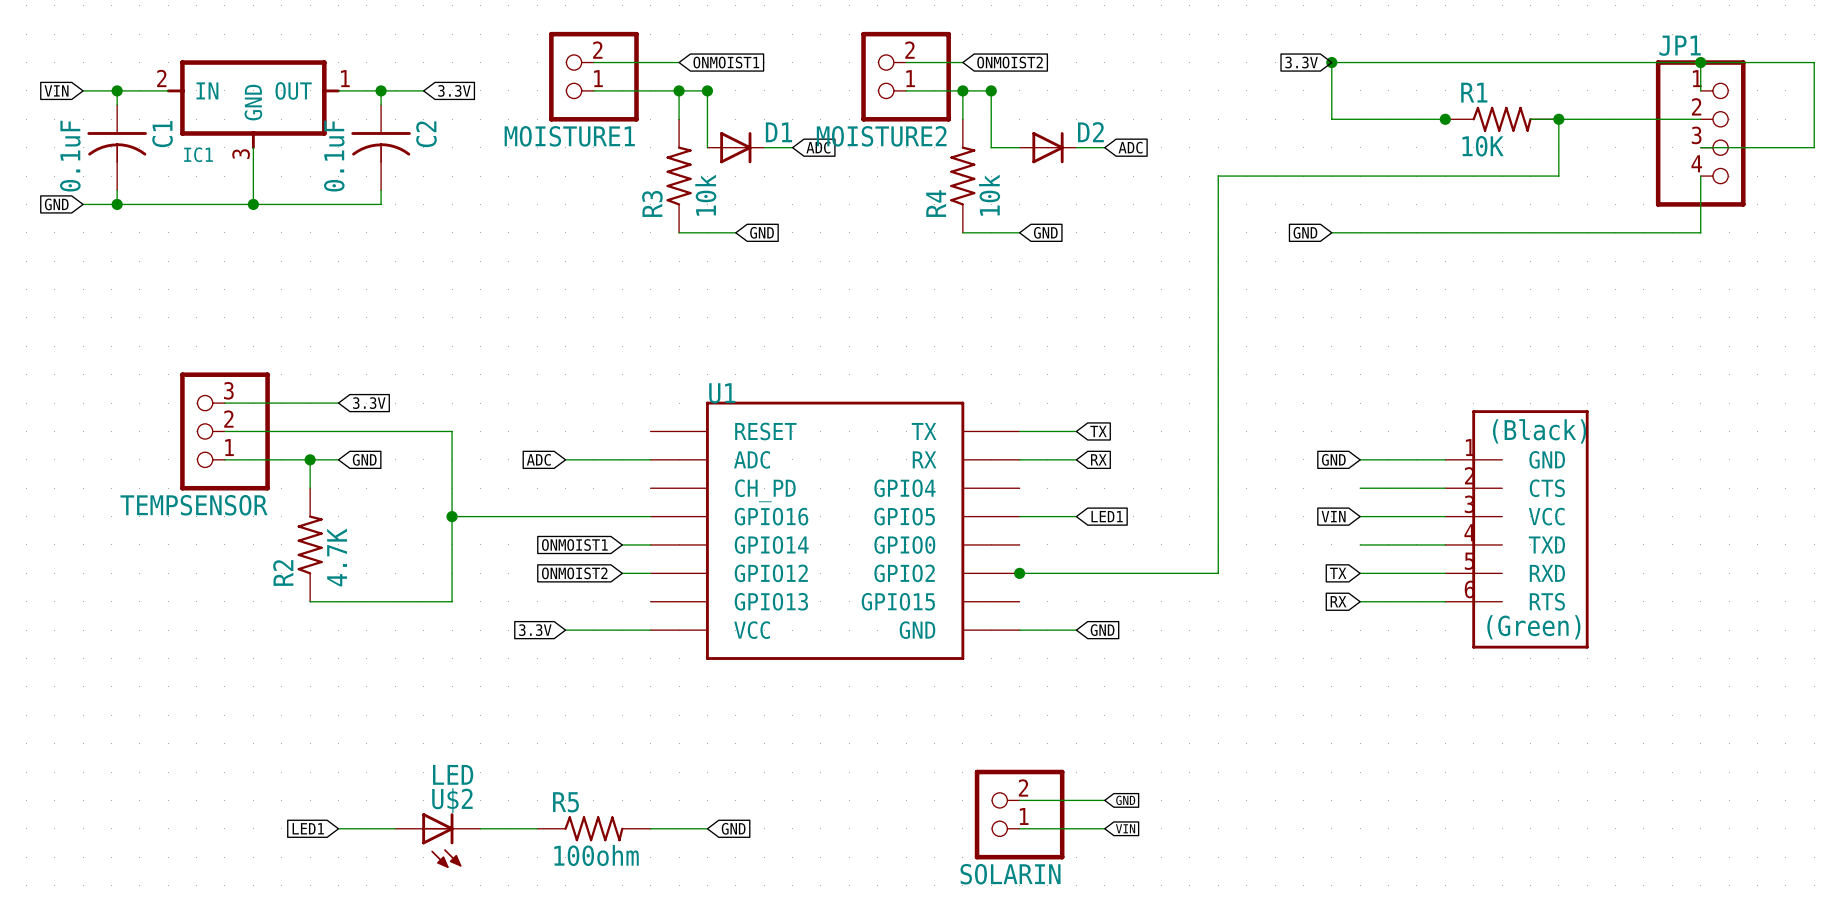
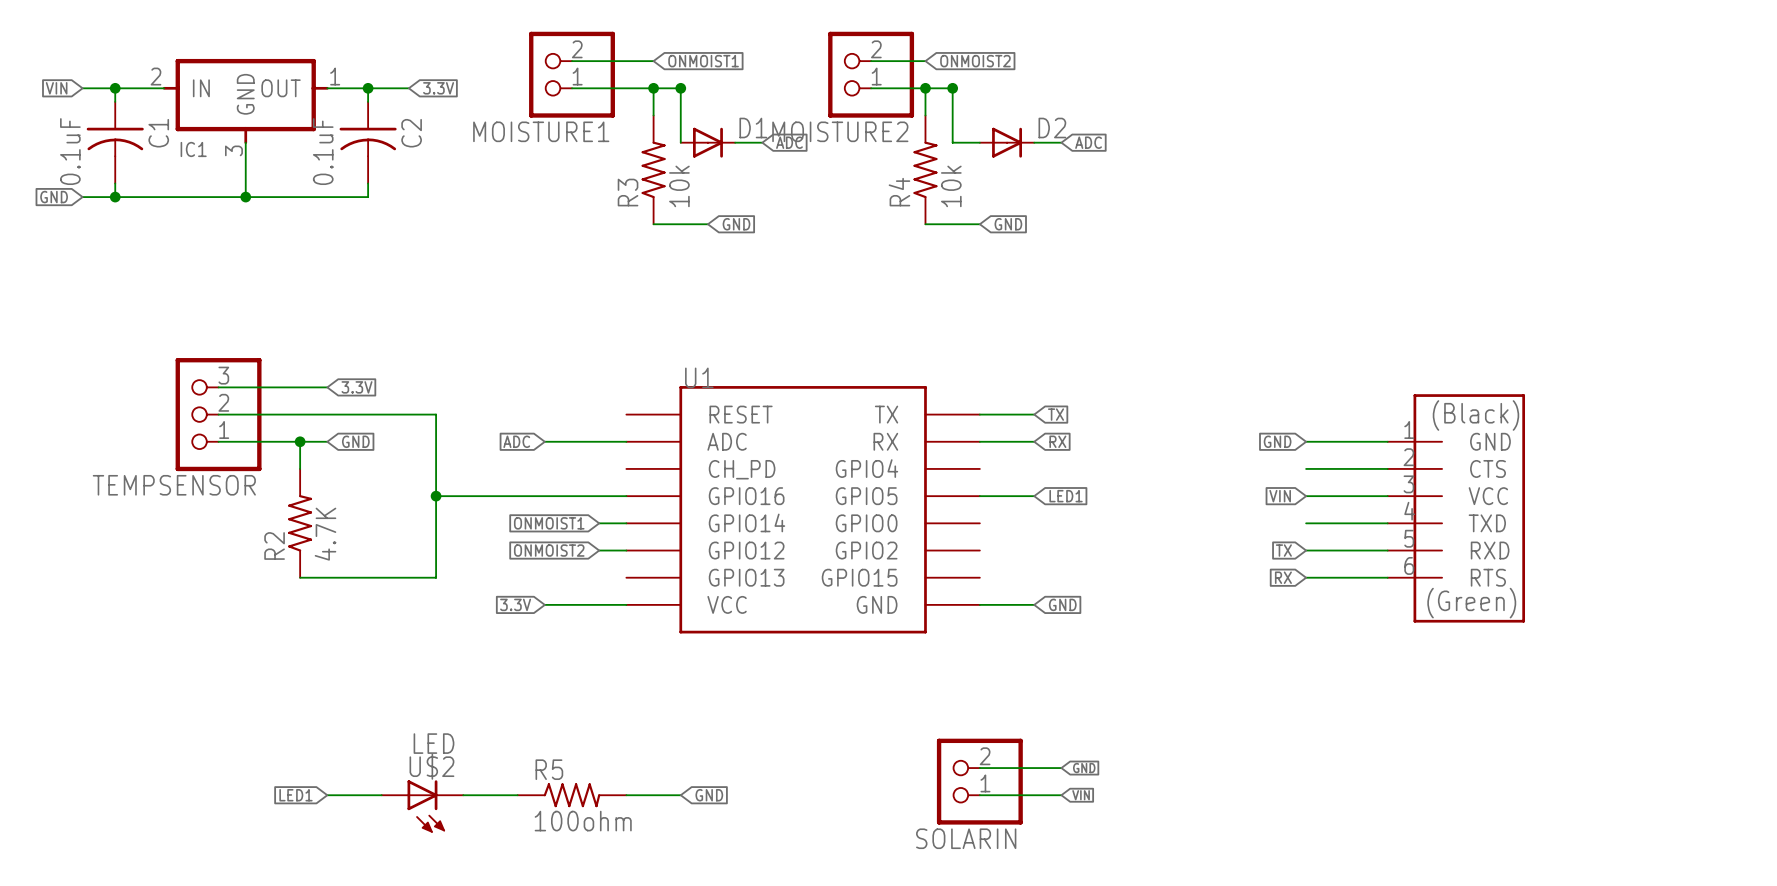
global label: 3.3V (1301, 62) -> none
junction: (1331, 62) -> none
wire: (1700, 62) (1700, 90) -> none
junction: (1700, 62) -> none
wire: (1445, 119) (1331, 119) (1331, 62) (1814, 62) (1814, 147) (1700, 147) -> none
junction: (1445, 119) -> none
R1: 10K (1502, 119) -> none
wire: (1530, 119) (1700, 119) -> none
wire: (1558, 119) (1558, 176) (1218, 176) (1218, 573) (1019, 573) -> none
junction: (1558, 119) -> none
JP1: (1700, 133) -> none
wire: (1700, 176) (1700, 232) (1331, 232) -> none
global label: GND (1305, 232) -> none
junction: (1019, 573) -> none

